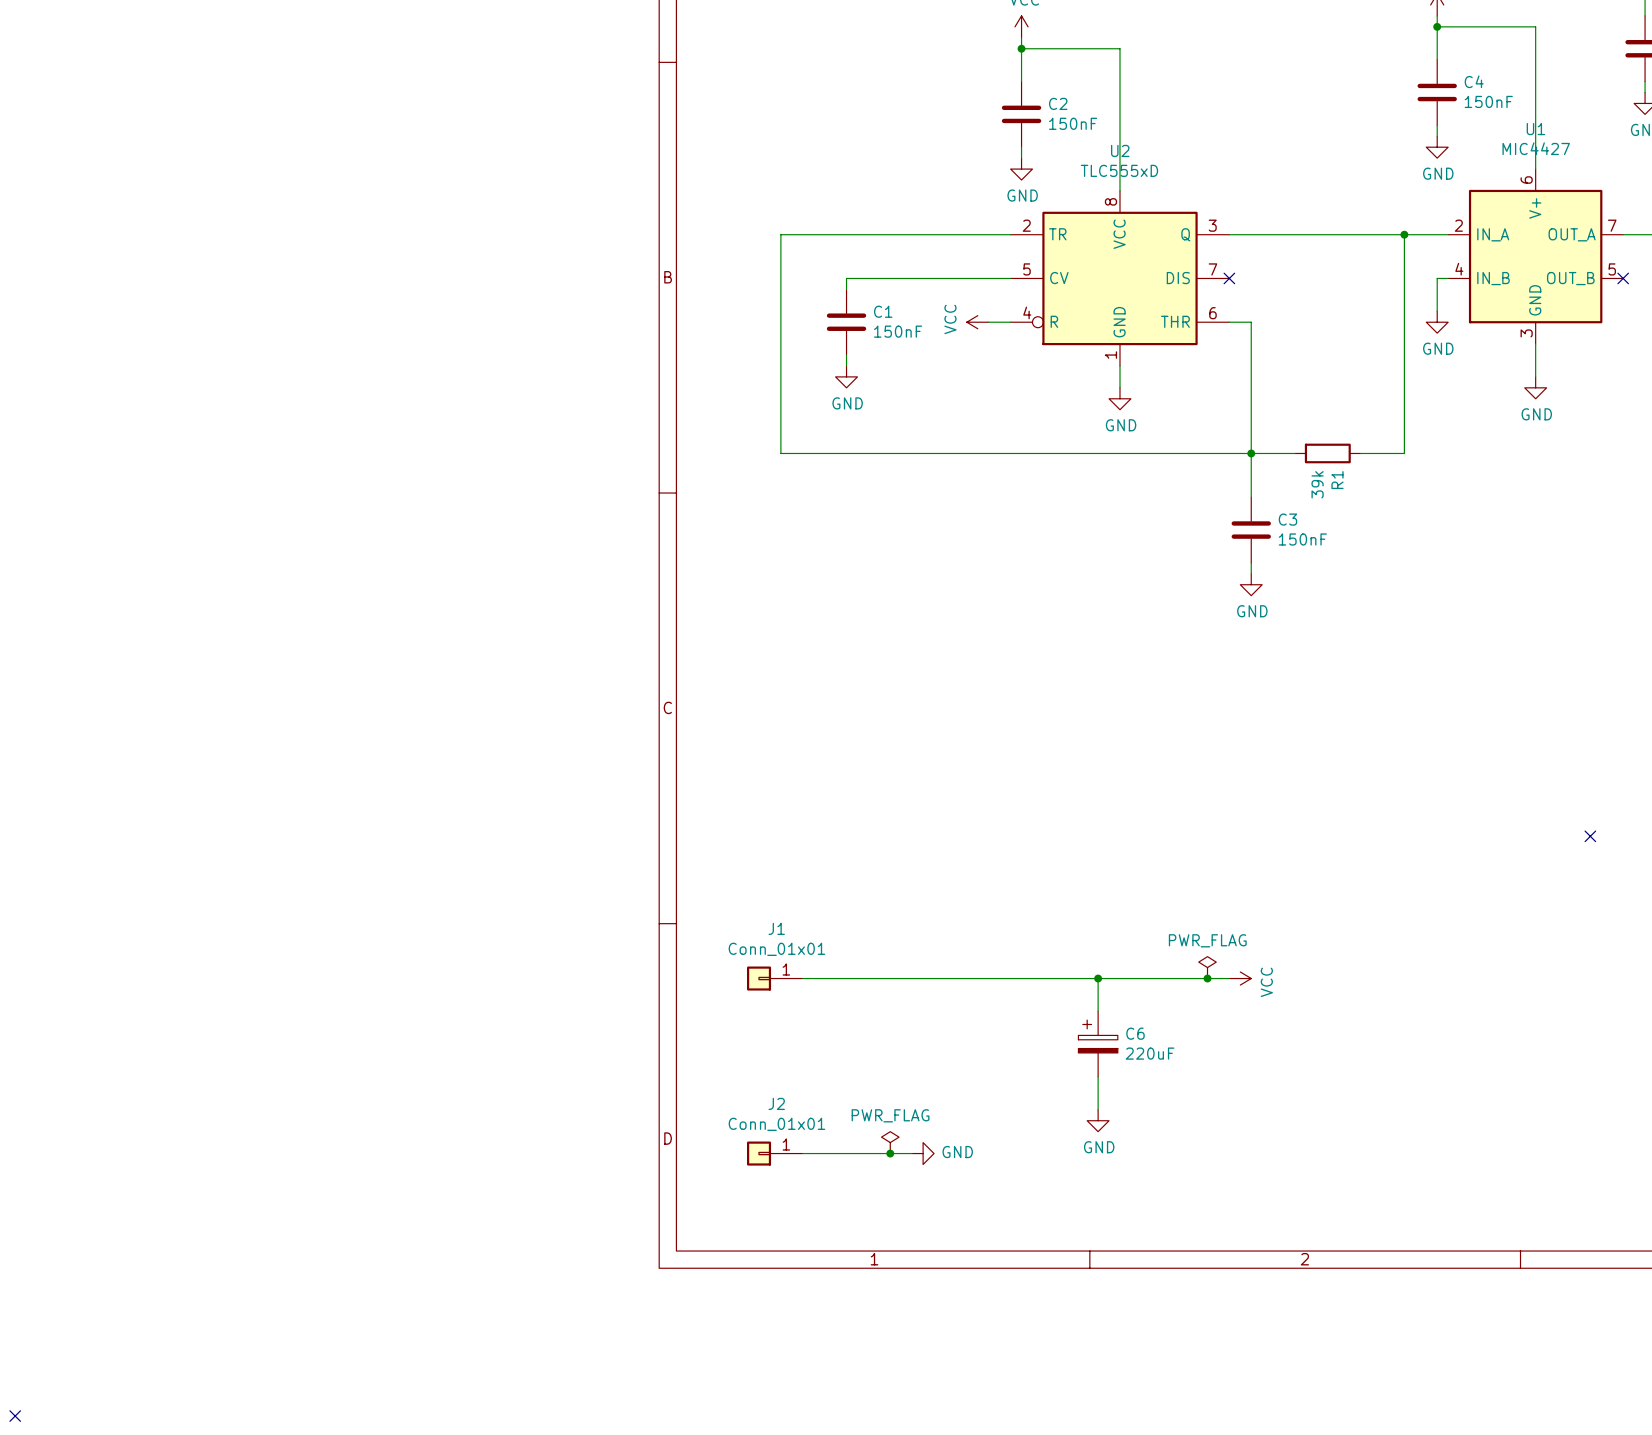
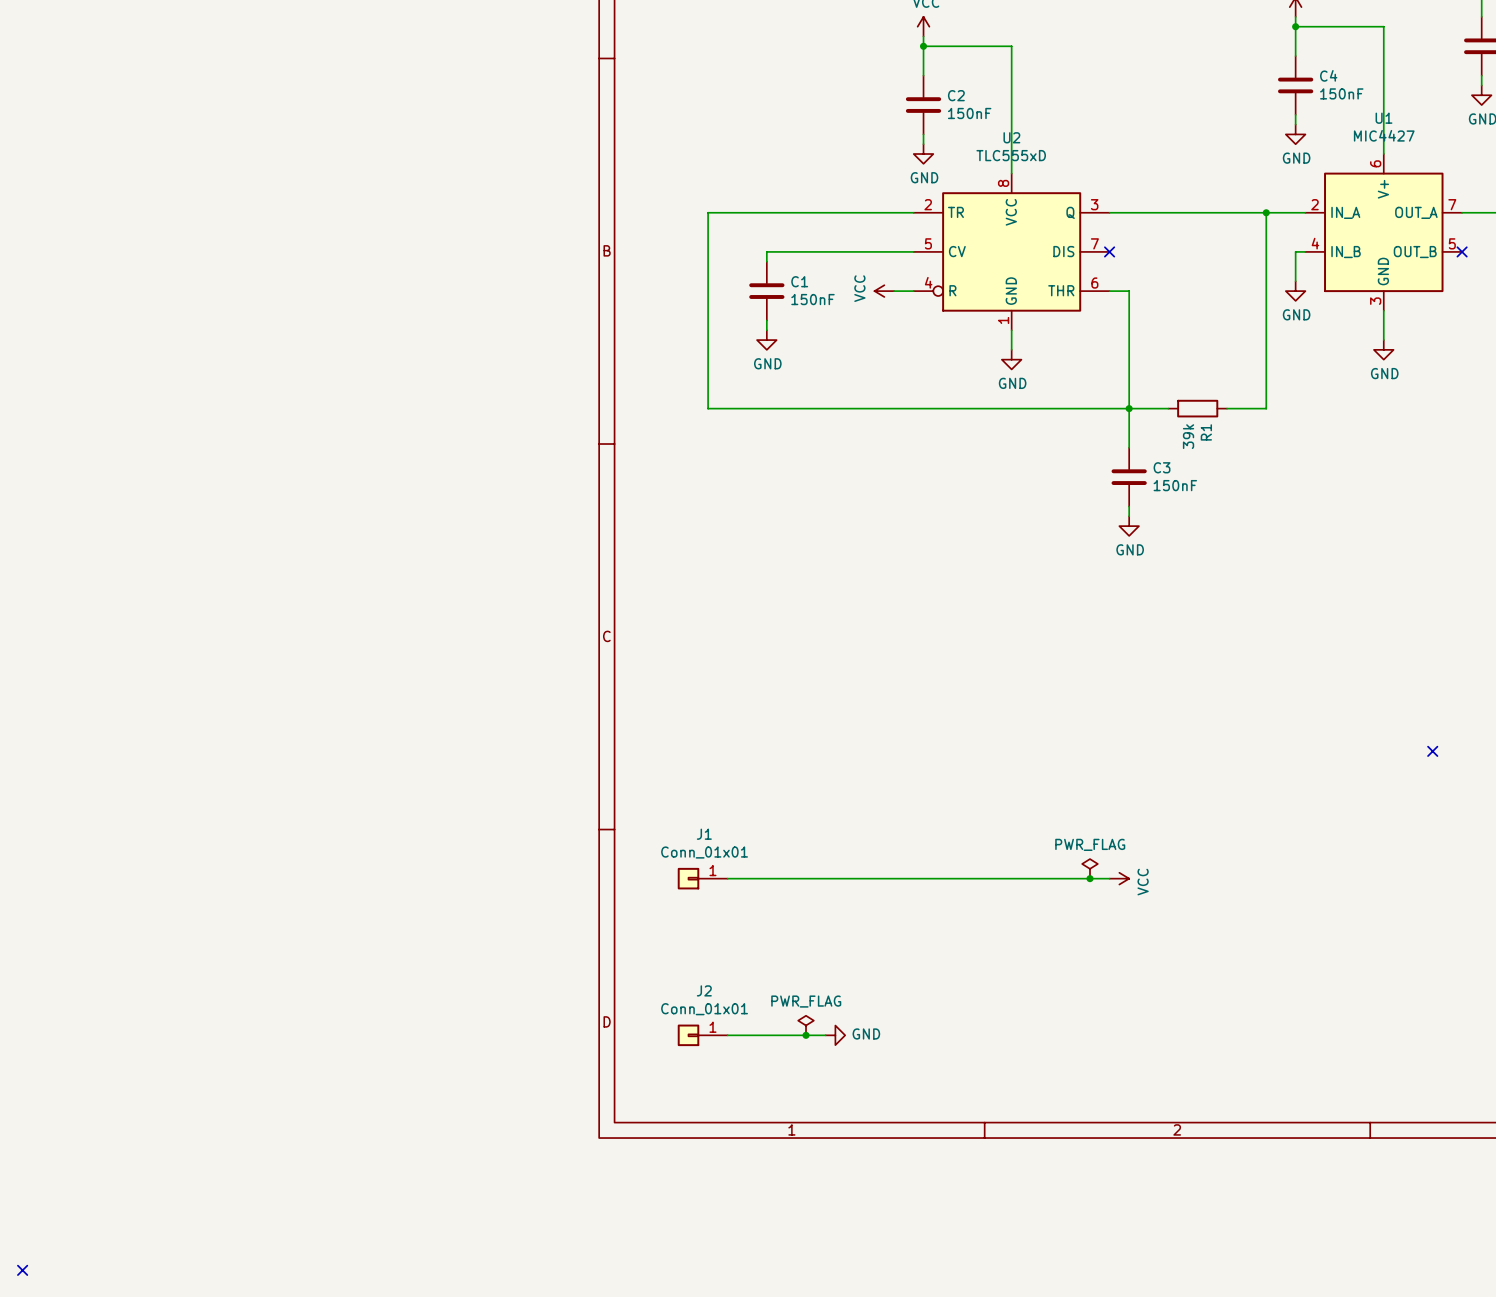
wire: (1098, 978) (1098, 1011) -> none
junction: (1098, 978) -> none
C6: 220uF (1098, 1044) -> none
wire: (1098, 1076) (1098, 1109) -> none
power symbol: GND (1098, 1120) -> none

